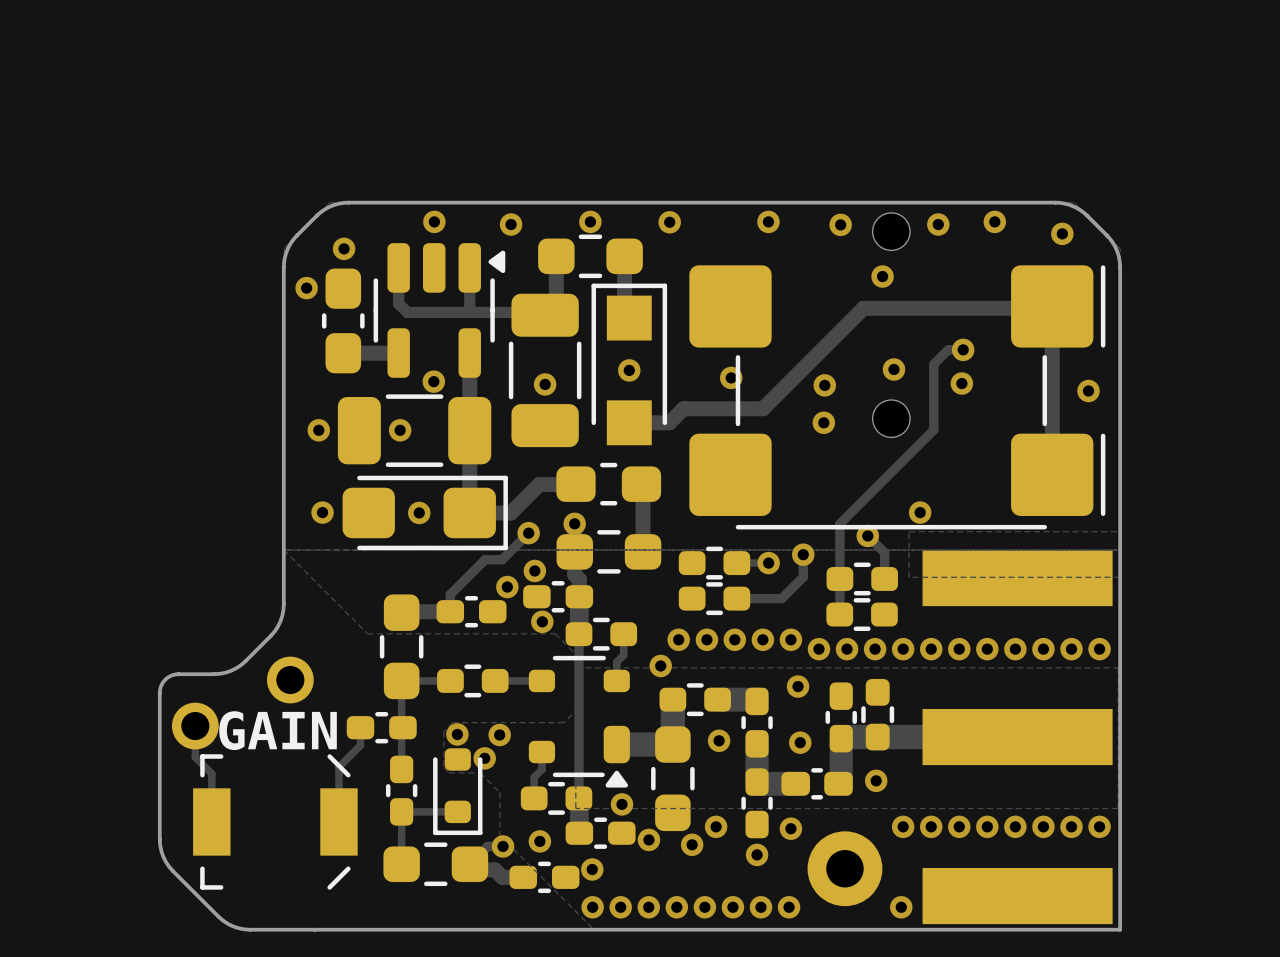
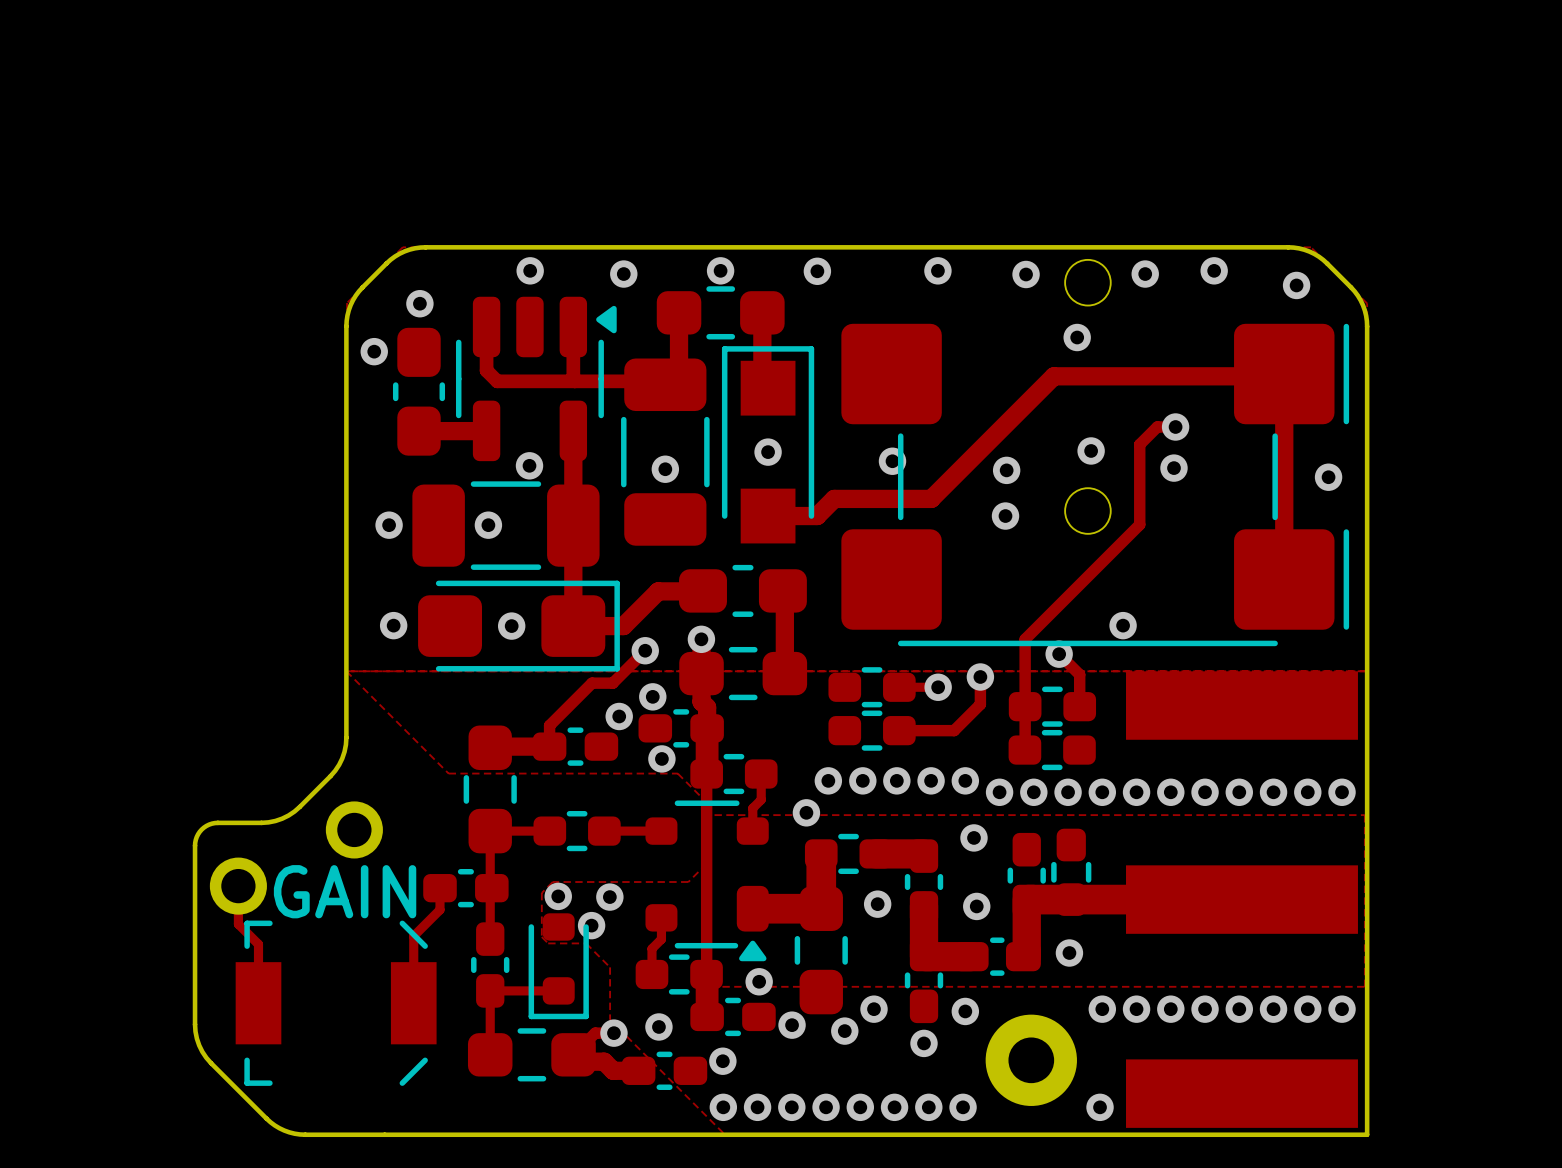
zone outline: (1120, 531) (909, 531) (909, 577) (1120, 577) -> none

